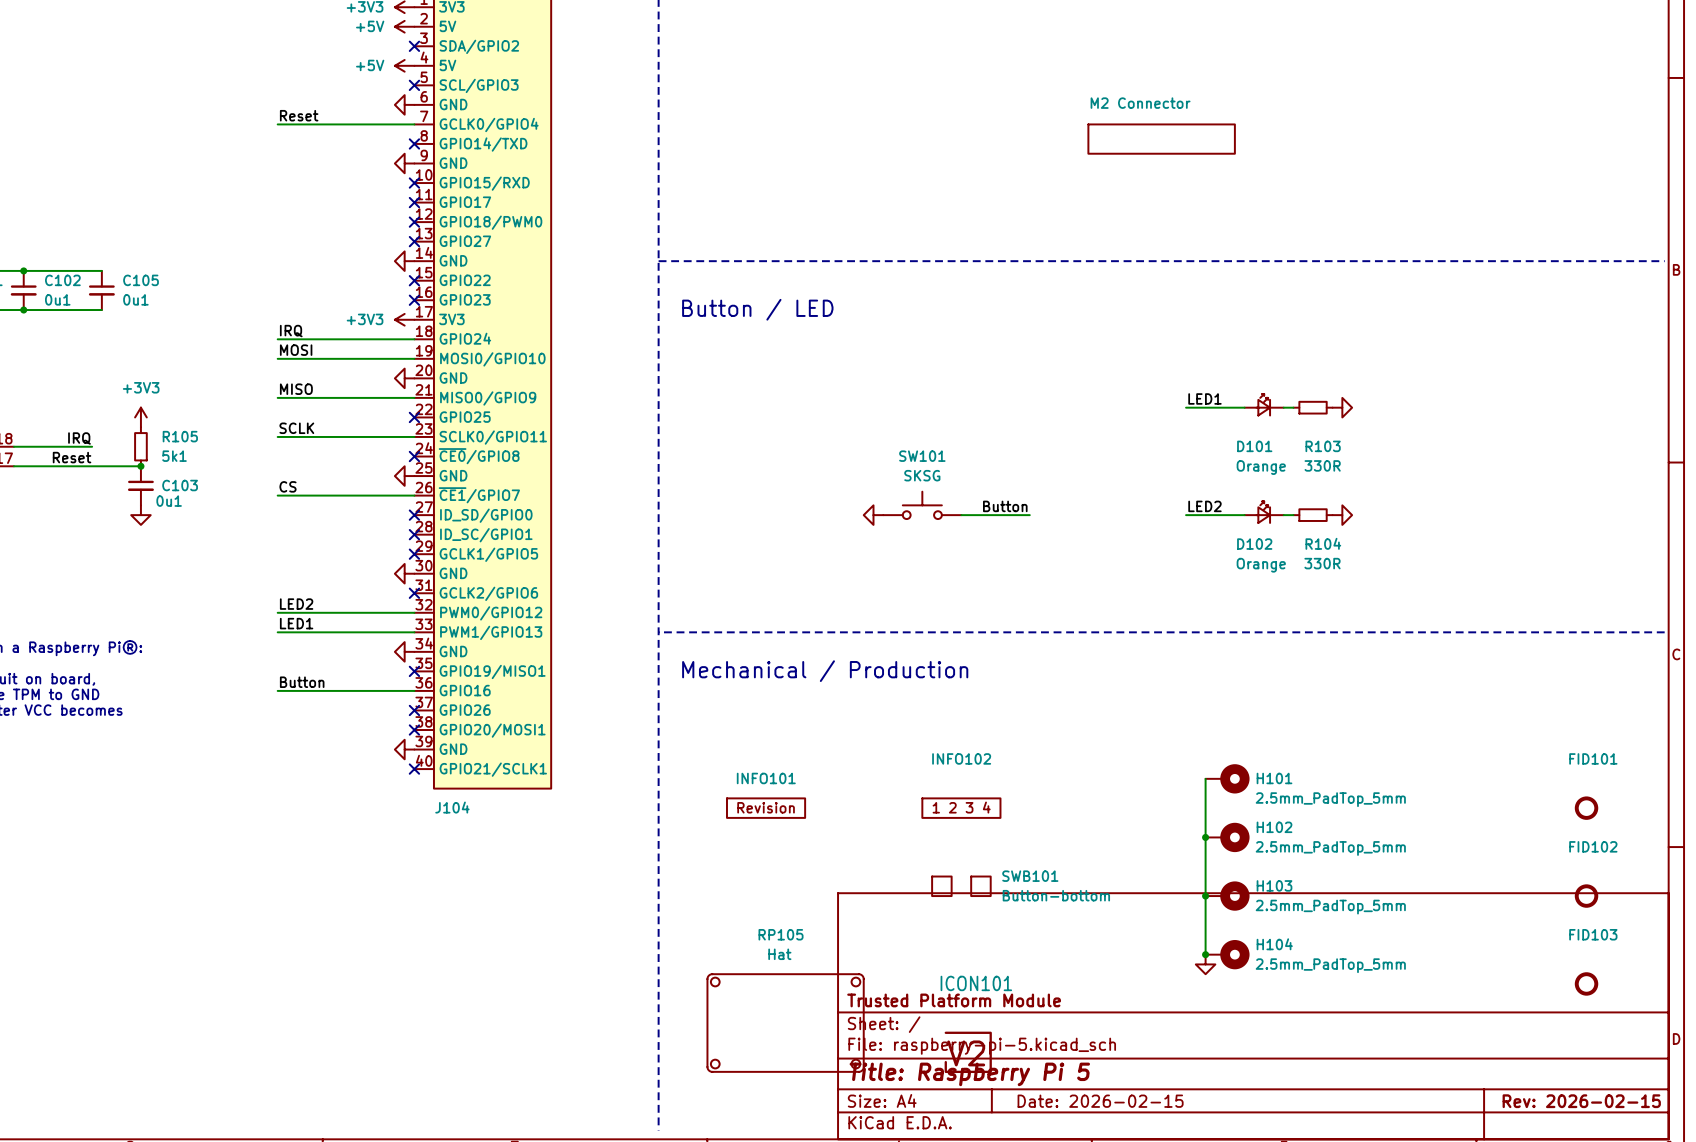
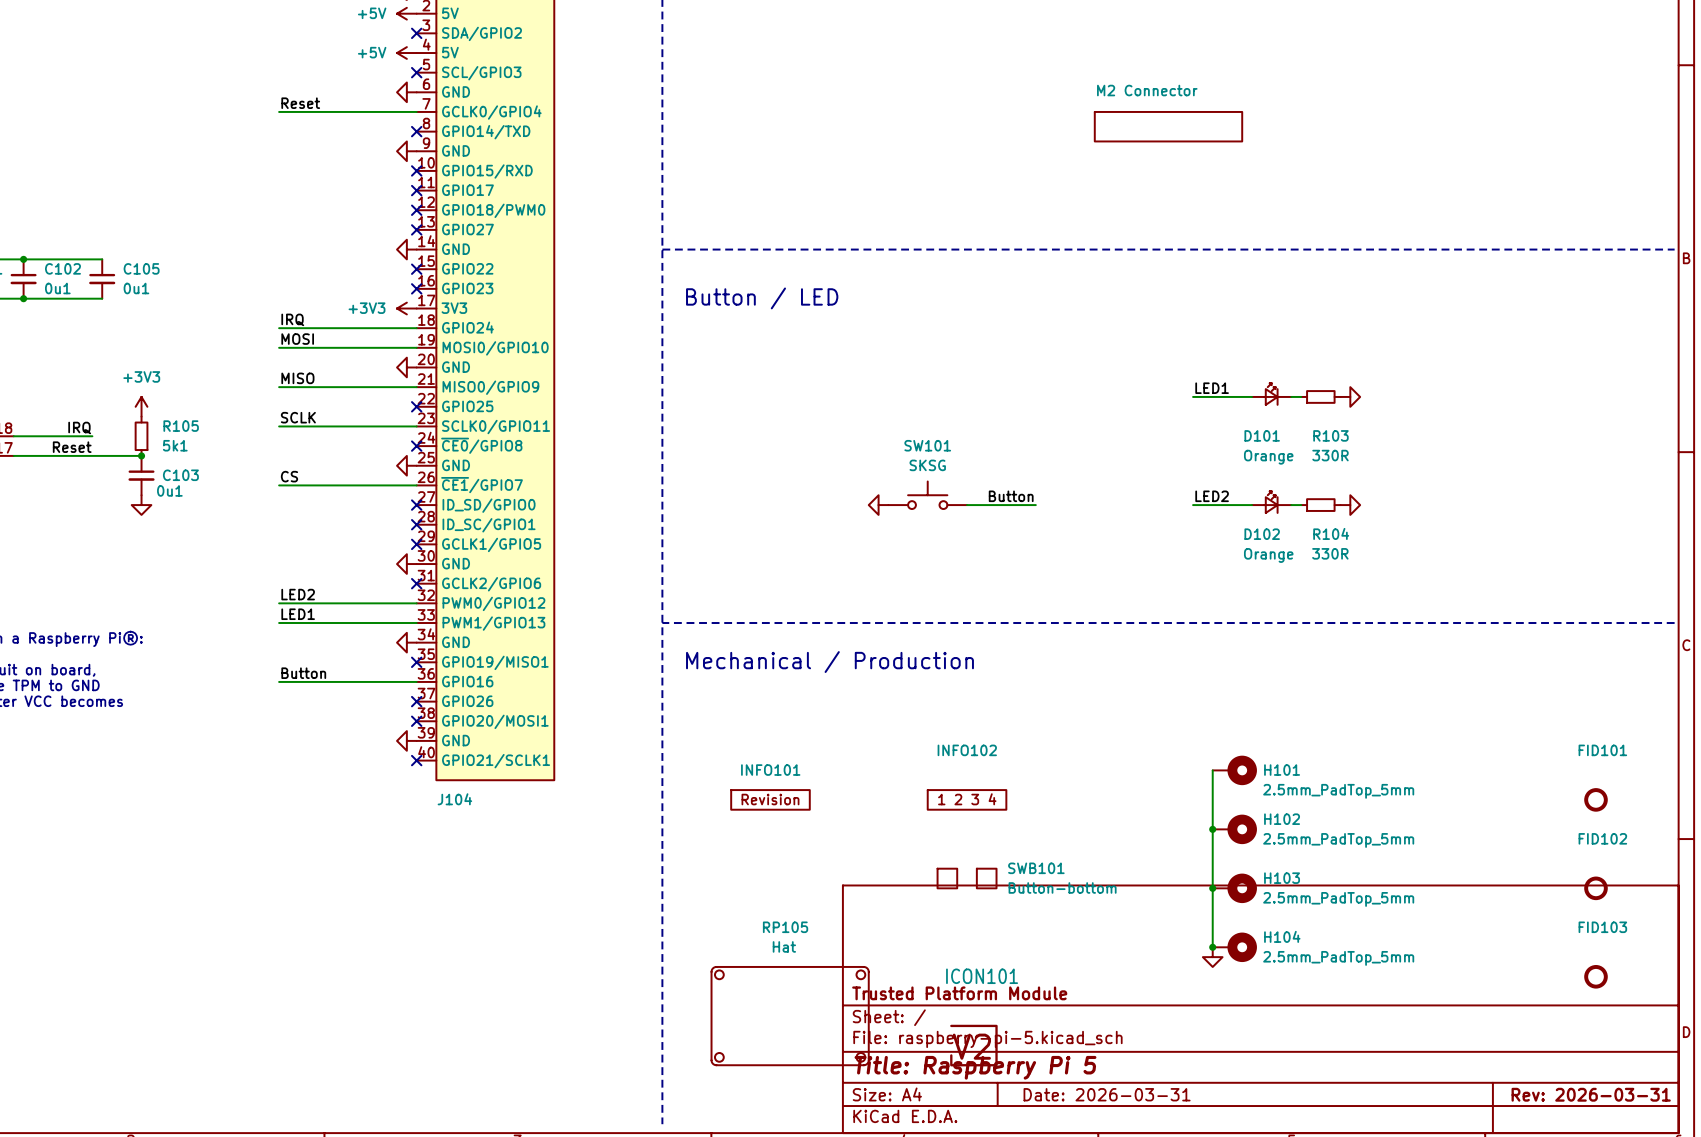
title block: Date: 2026-02-15 (1100, 1101) -> Date: 2026-03-31 (1107, 1094)
title block: Rev: 2026-02-15 (1581, 1101) -> Rev: 2026-03-31 (1591, 1094)

